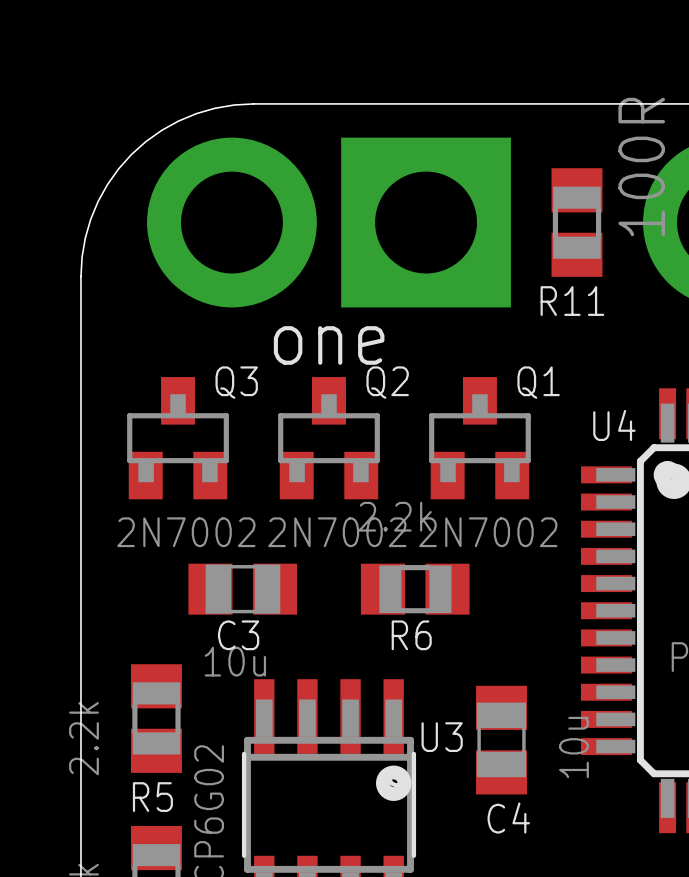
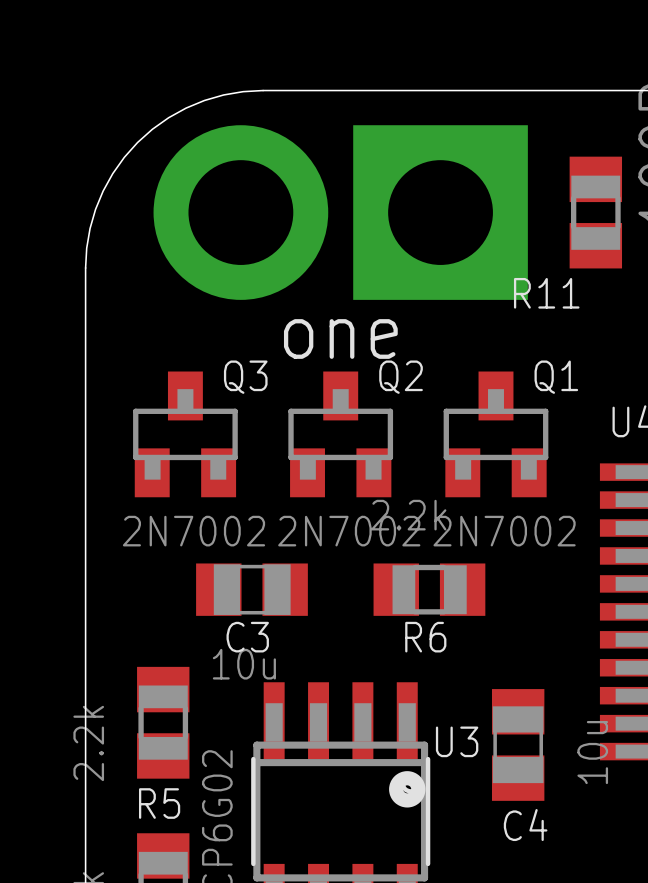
R11 name position: R11 (572, 301) -> R11 (546, 293)

